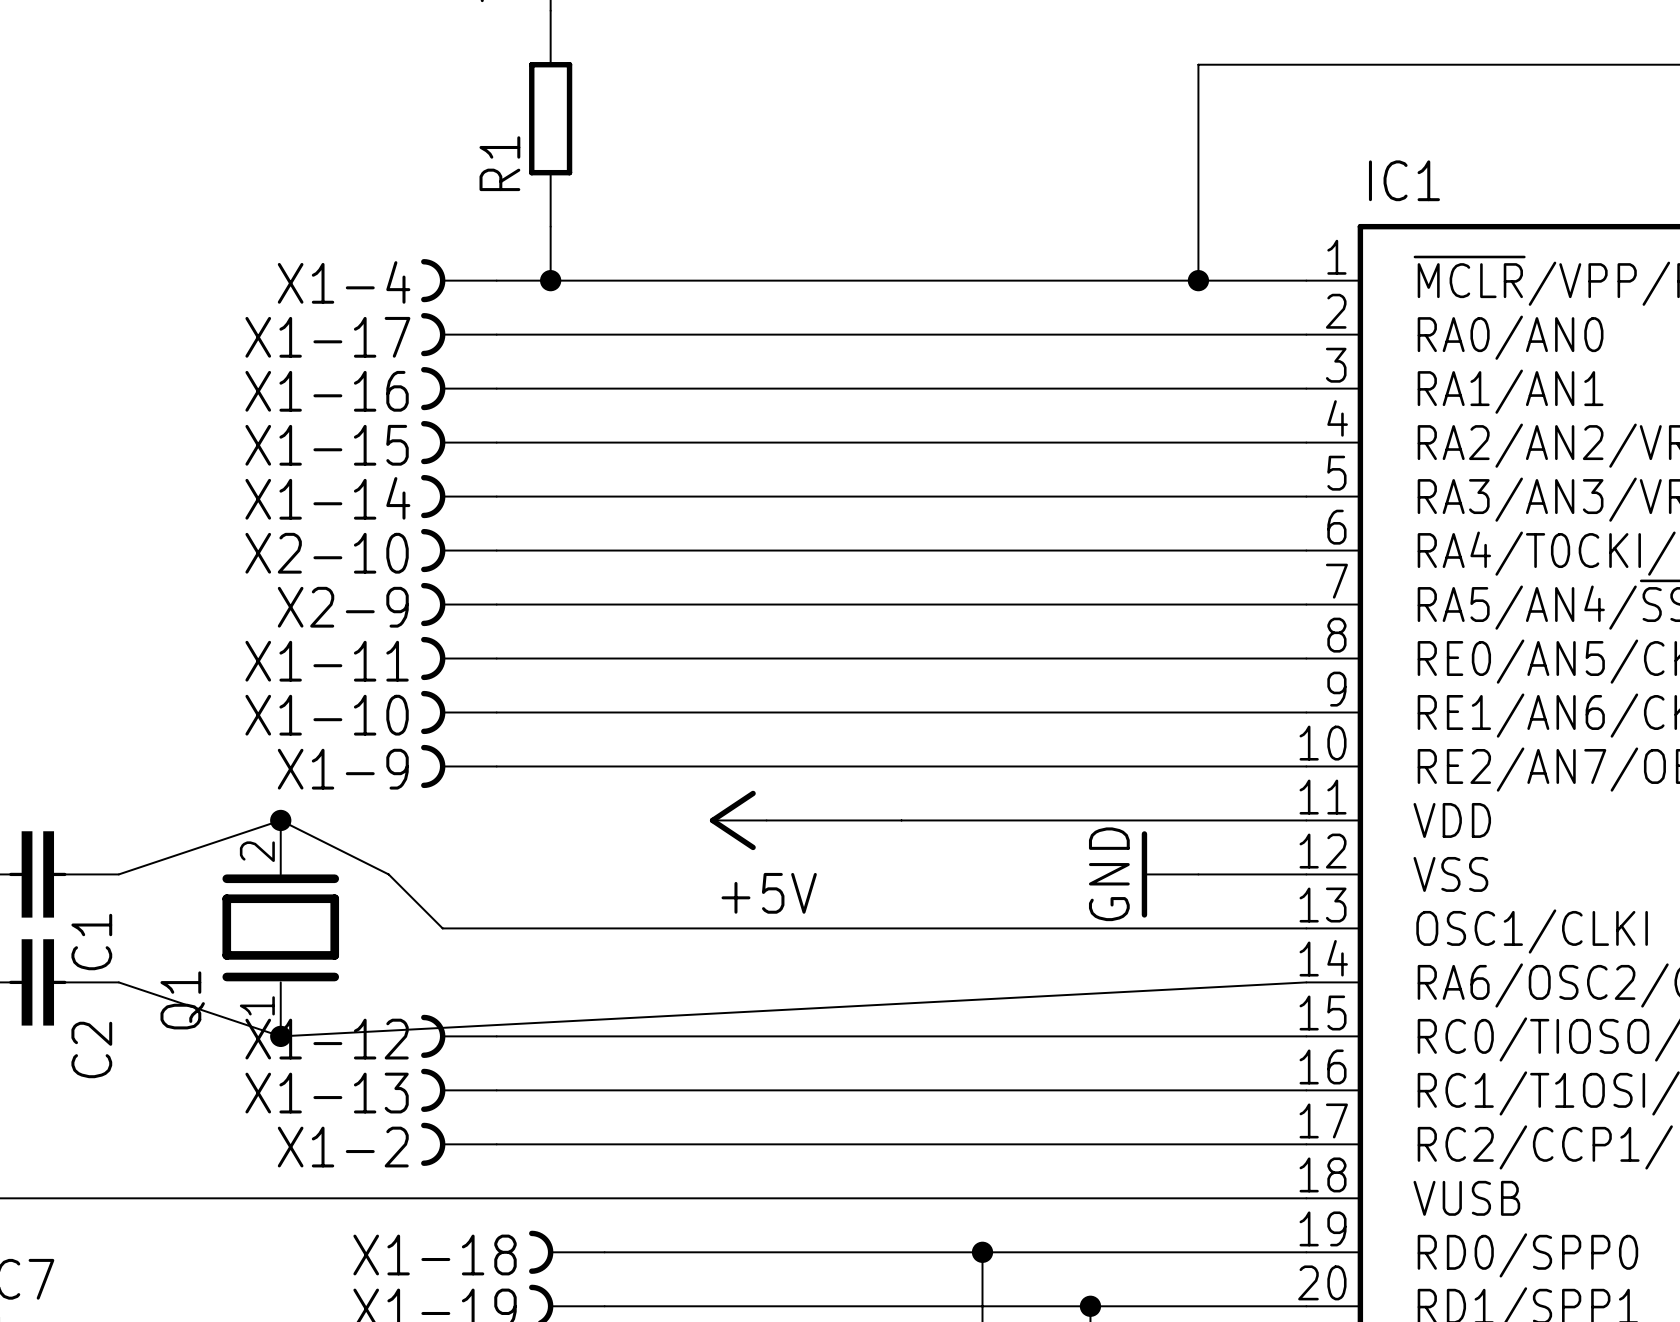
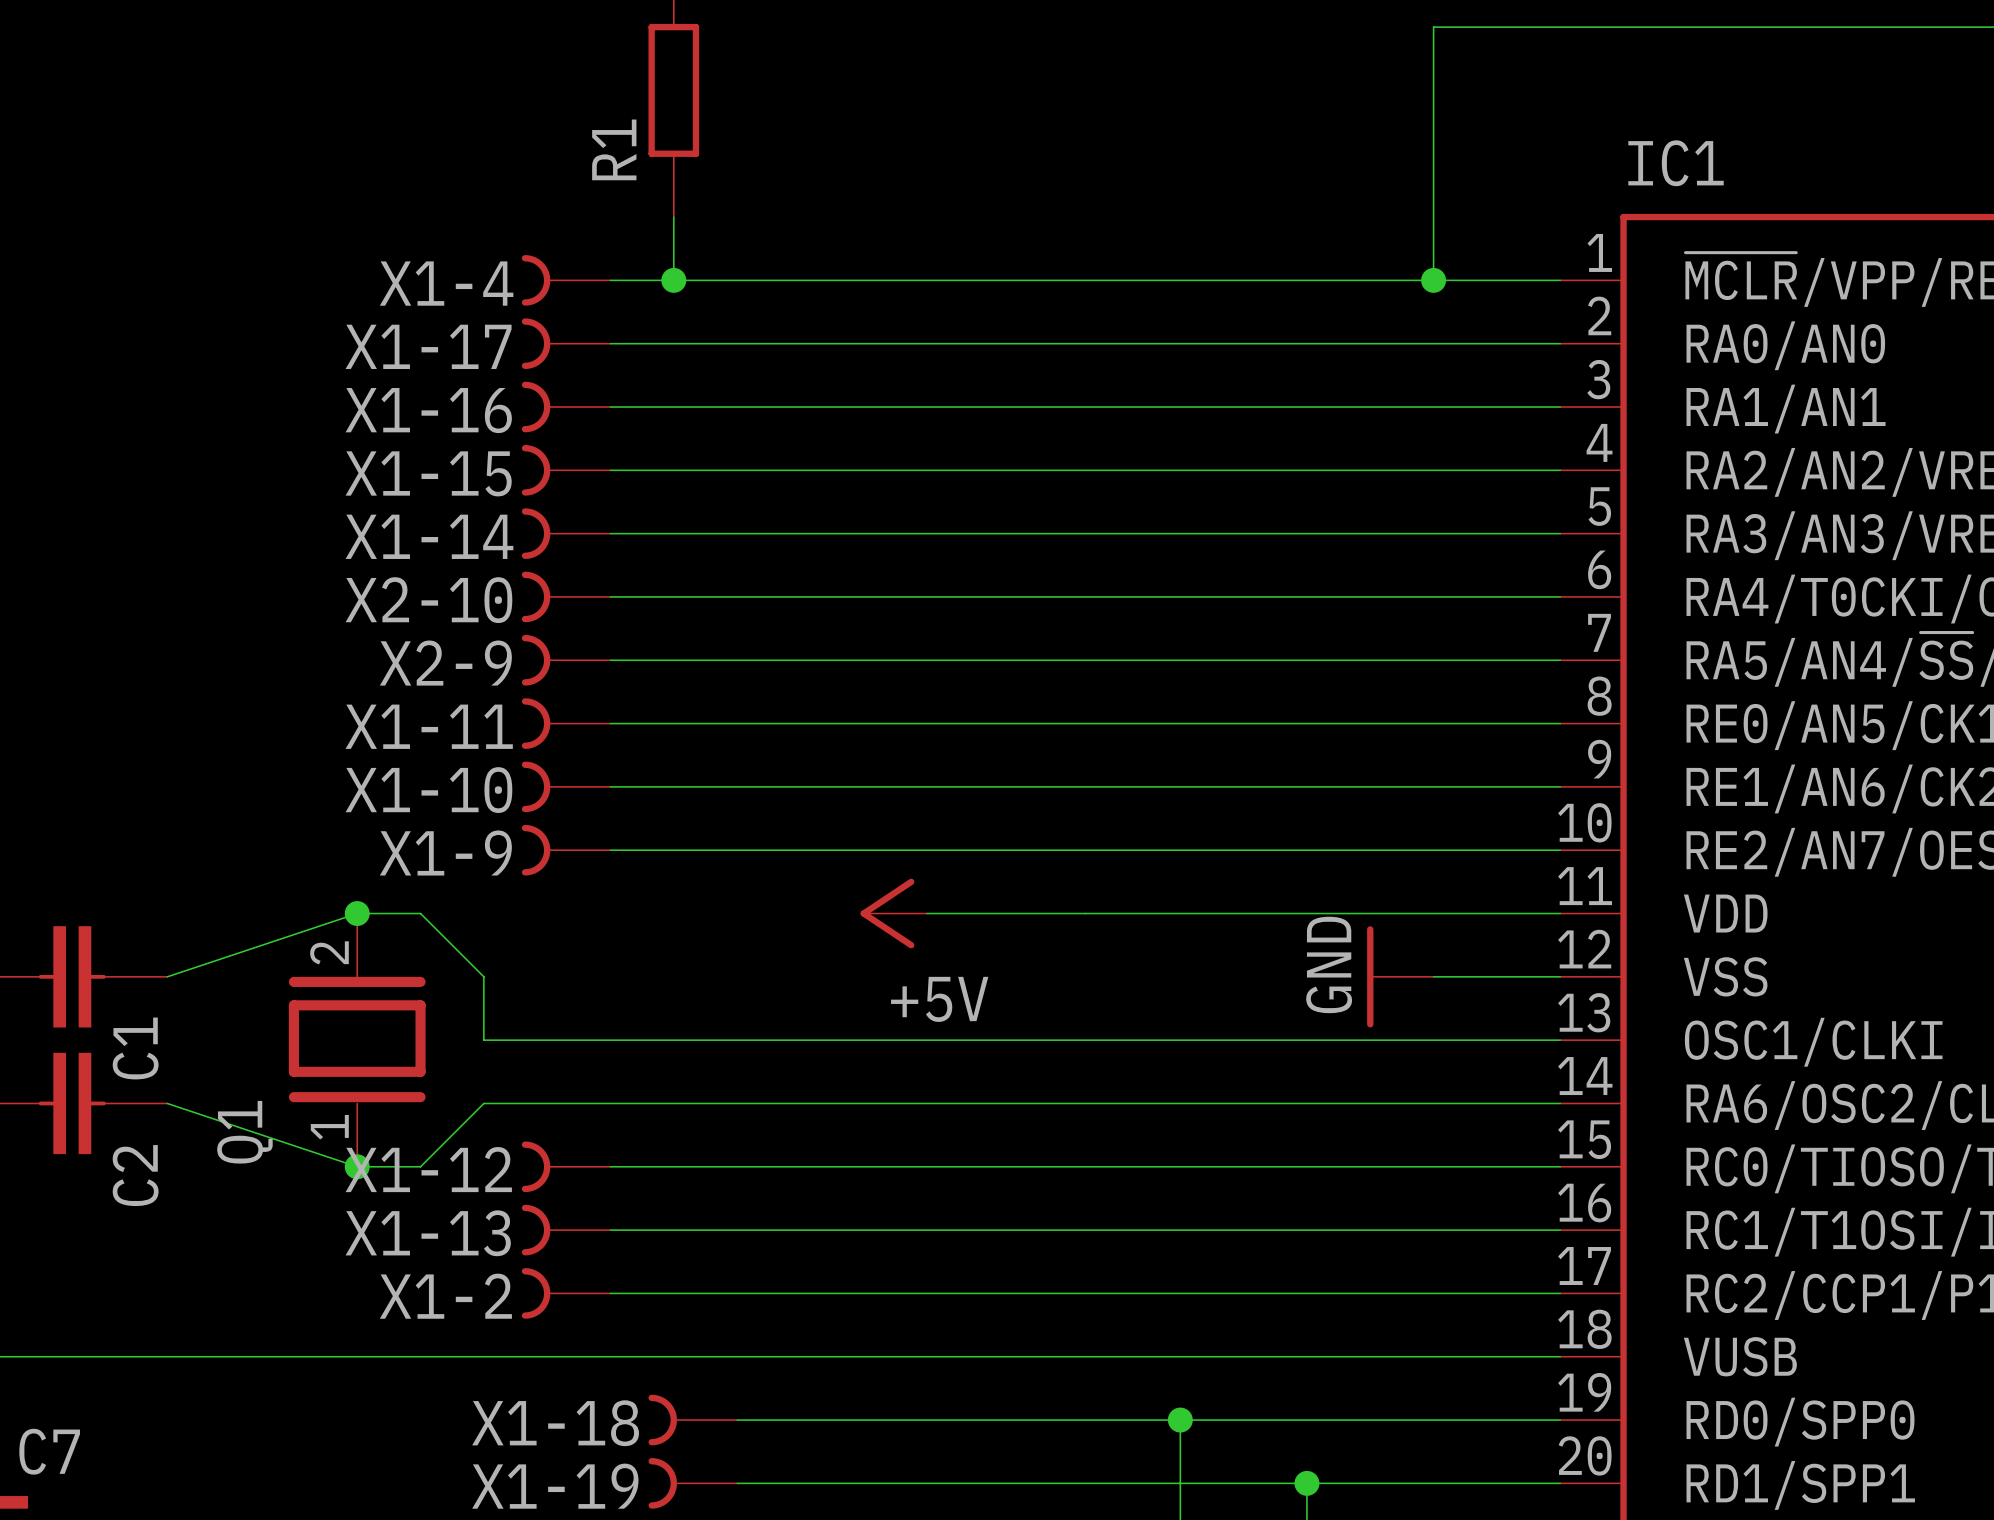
wire: (280, 820) (388, 874) (442, 928) -> (357, 913) (420, 913) (483, 976) (483, 1040) (547, 1040)
wire: (1306, 982) (280, 1036) -> (1560, 1103) (483, 1103) (420, 1166) (357, 1166)

